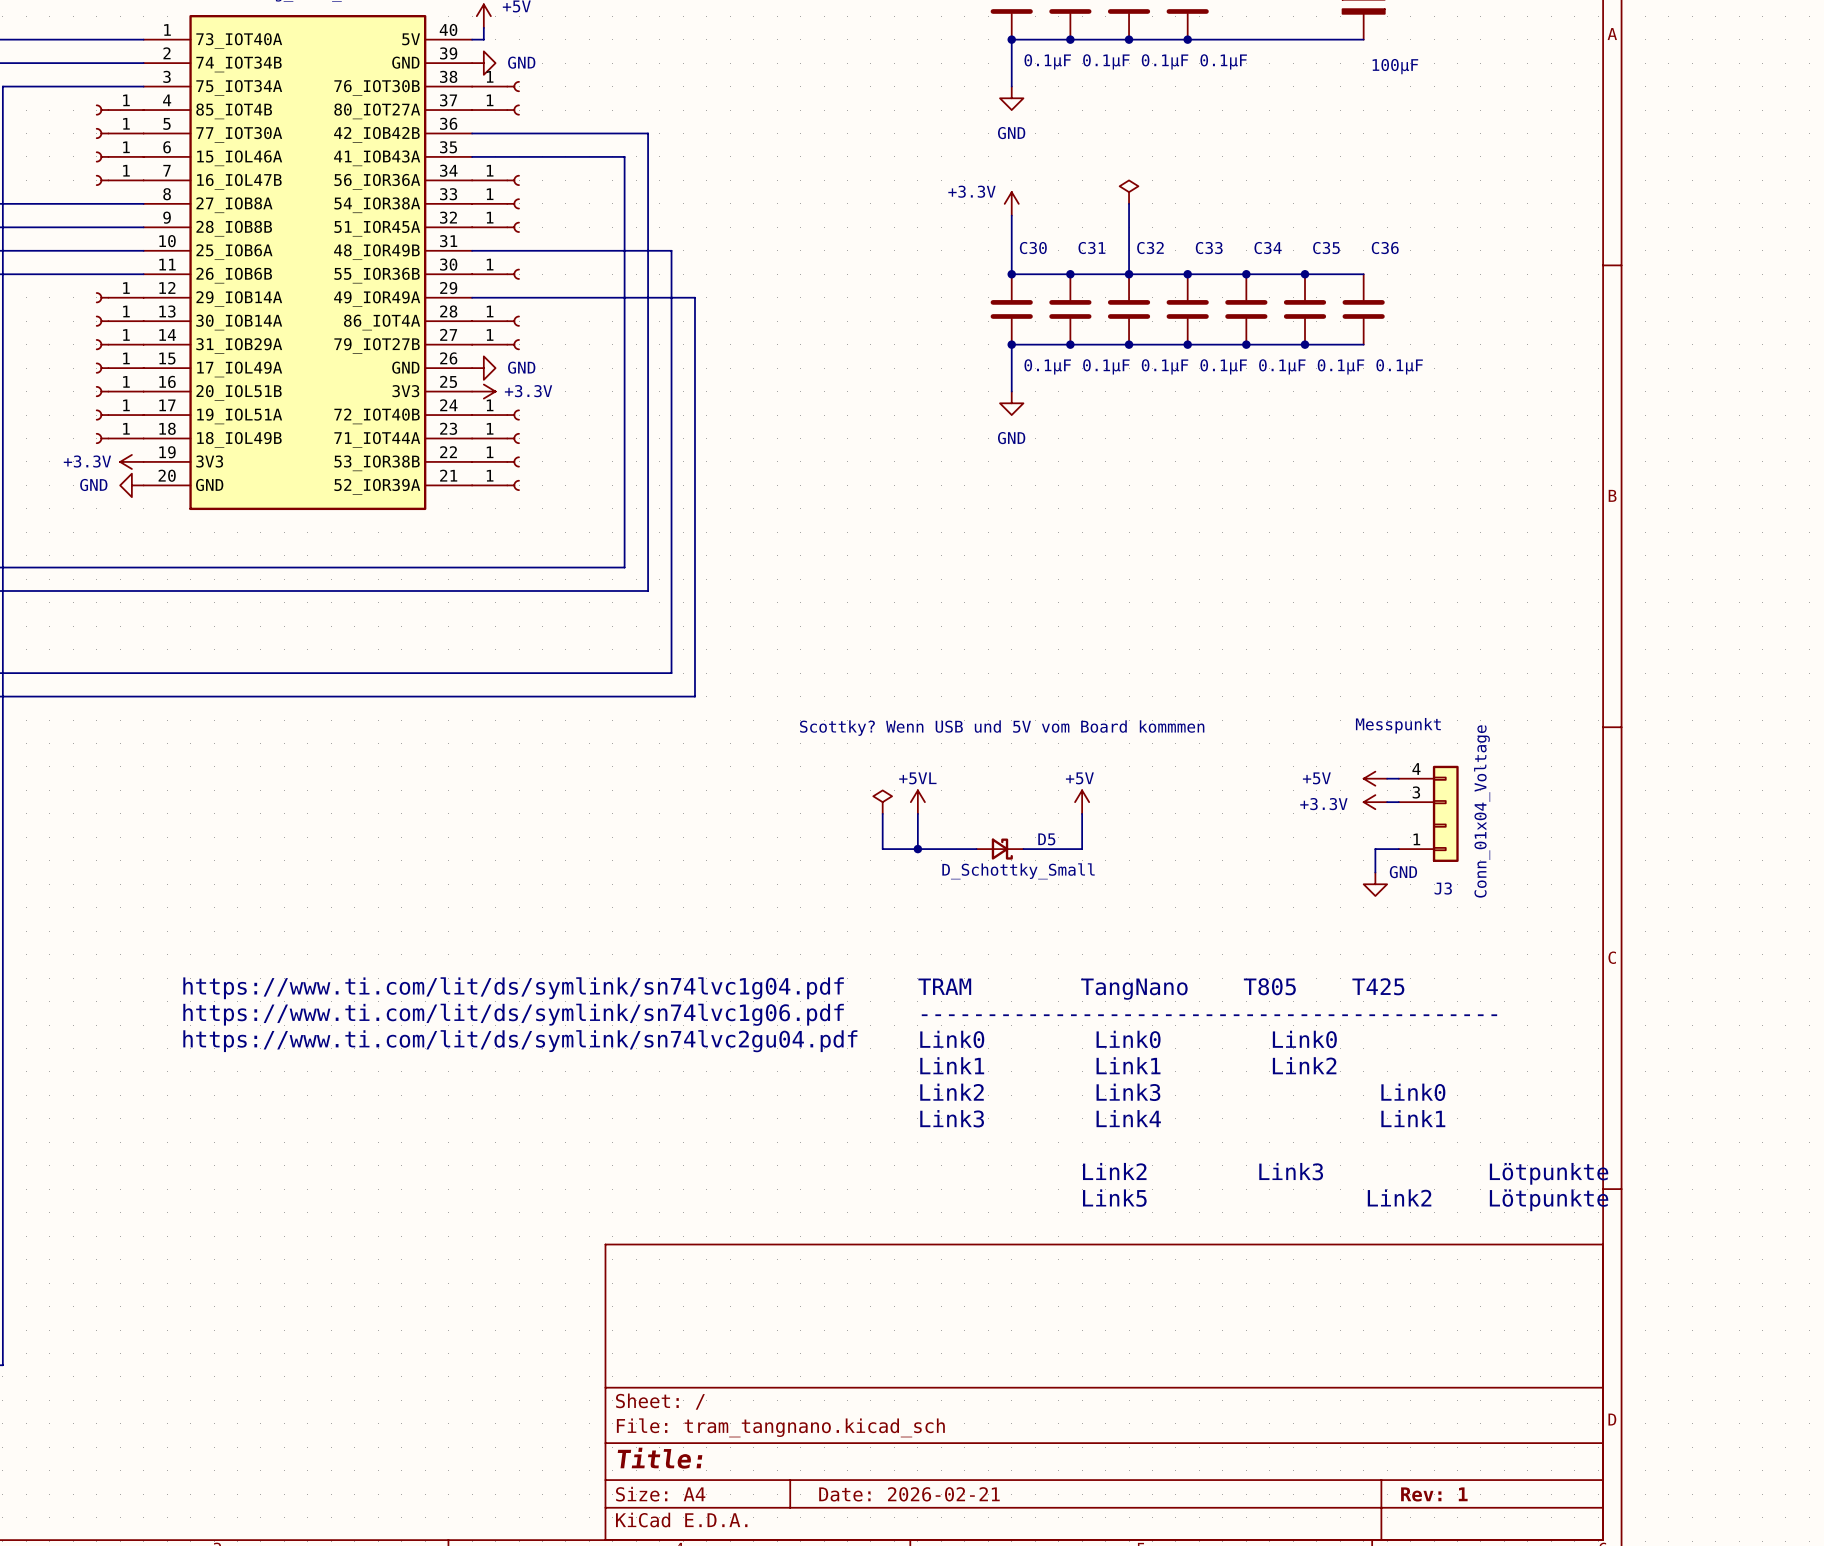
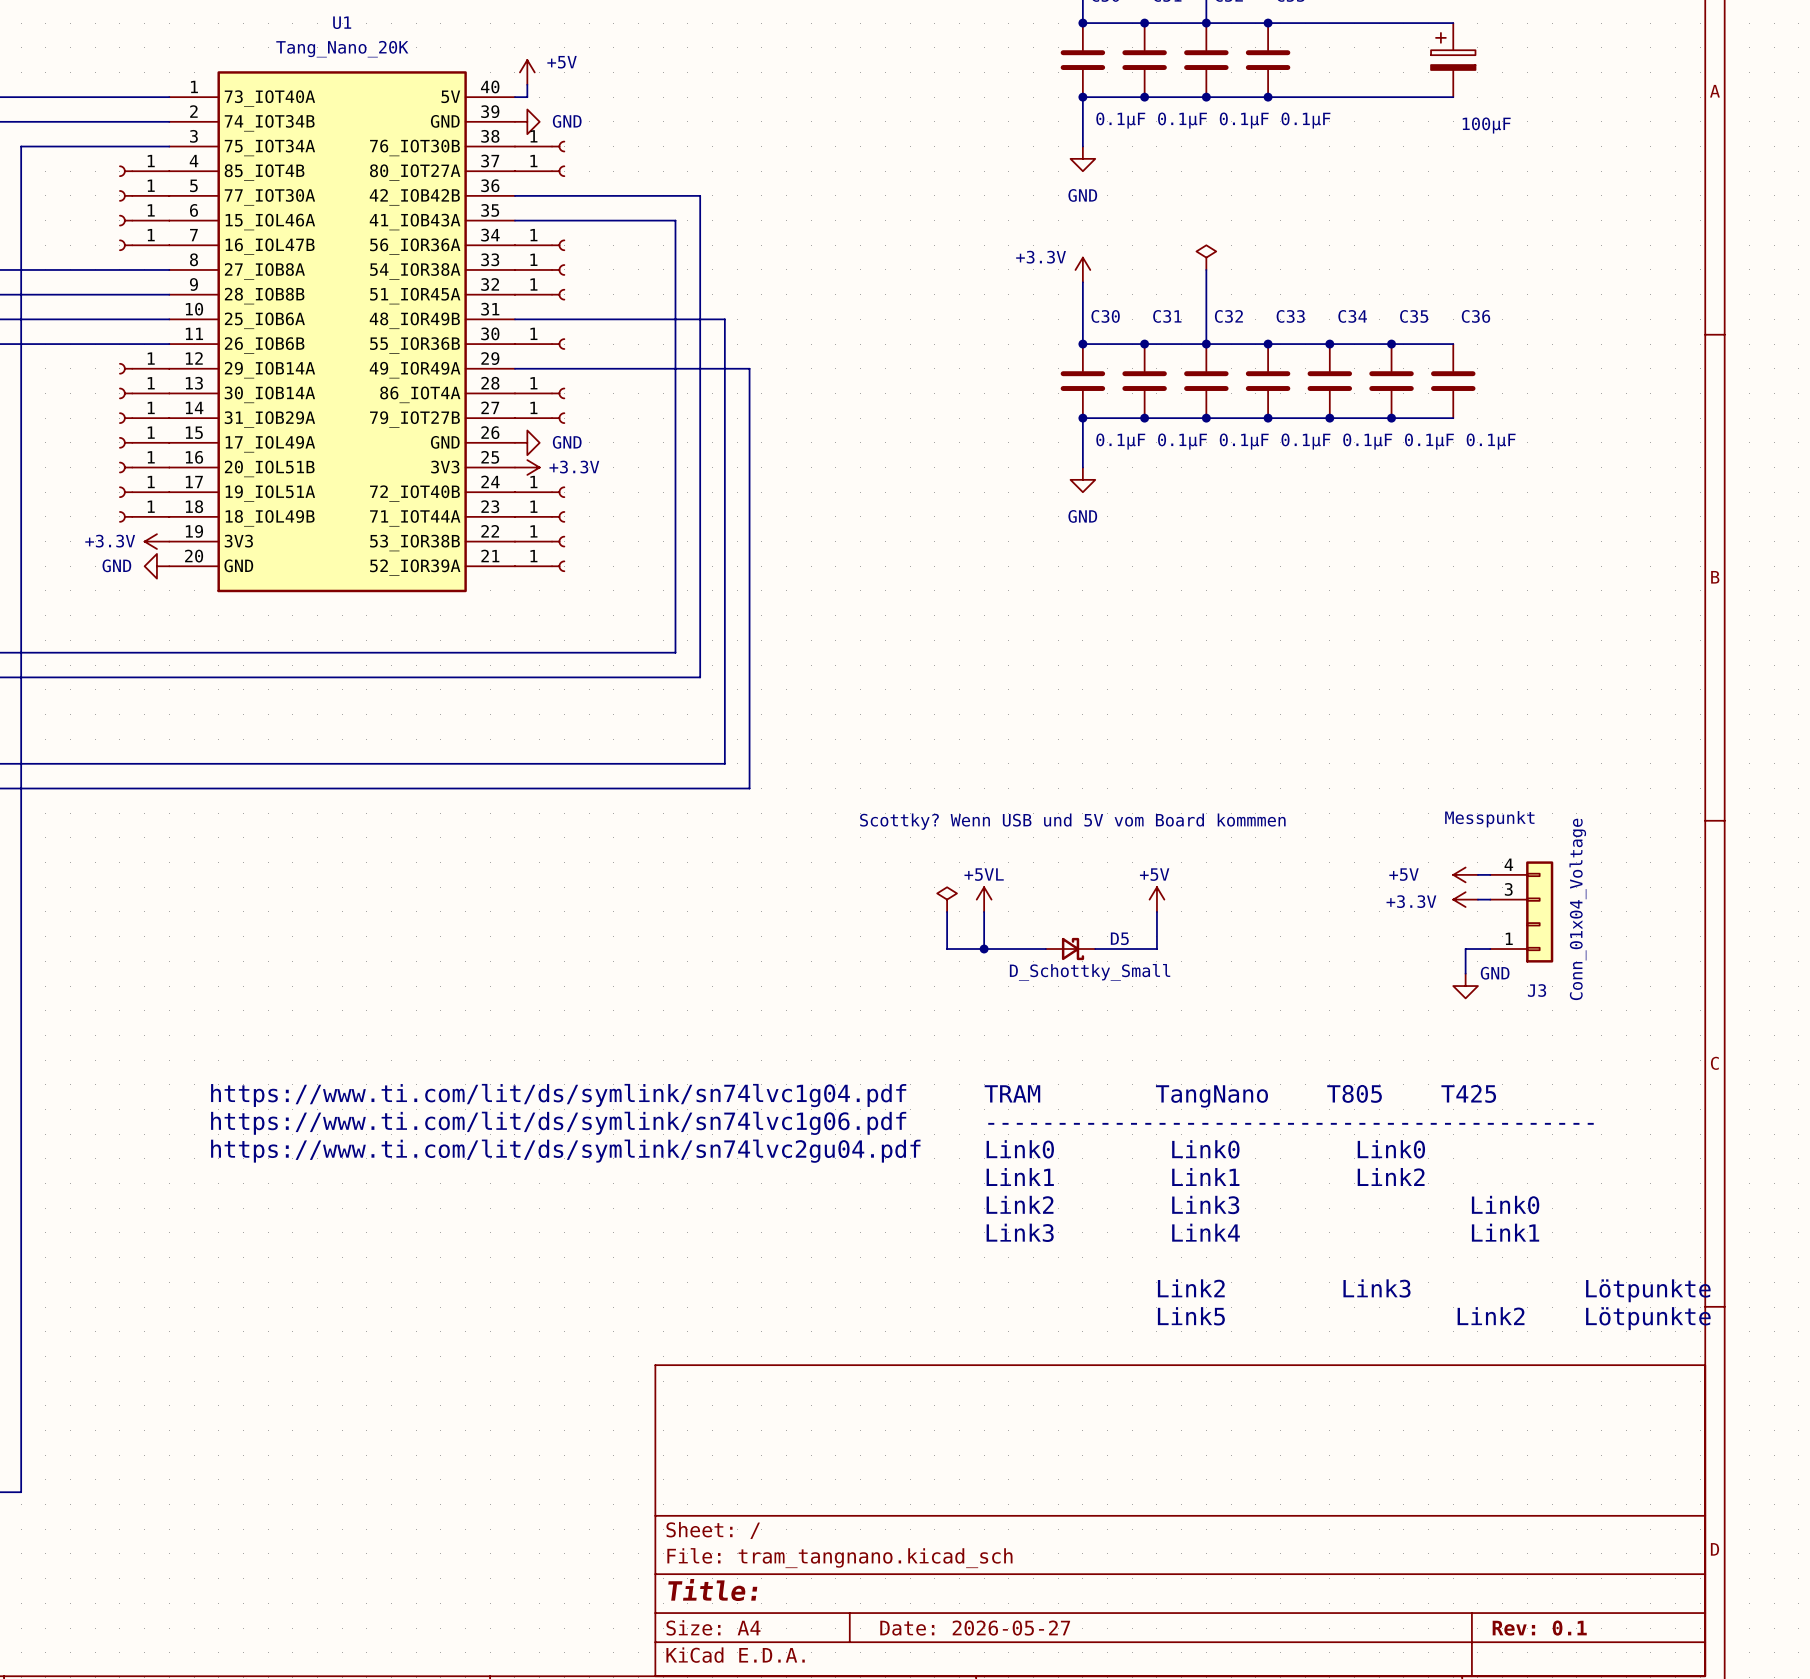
title block: Date: 2026-02-21 (909, 1494) -> Date: 2026-05-27 (975, 1628)
title block: Rev: 1 (1434, 1494) -> Rev: 0.1 (1539, 1628)

